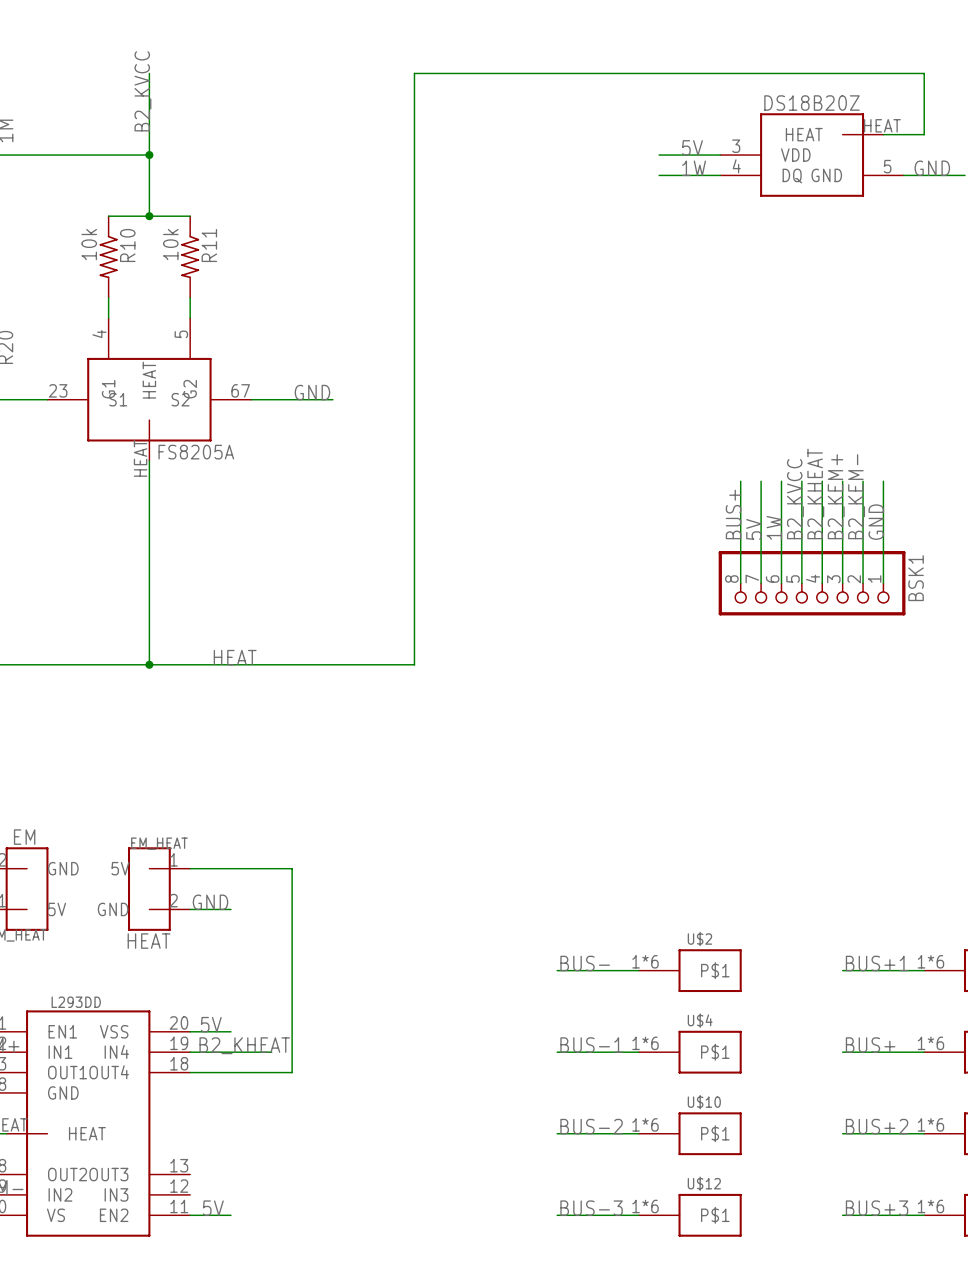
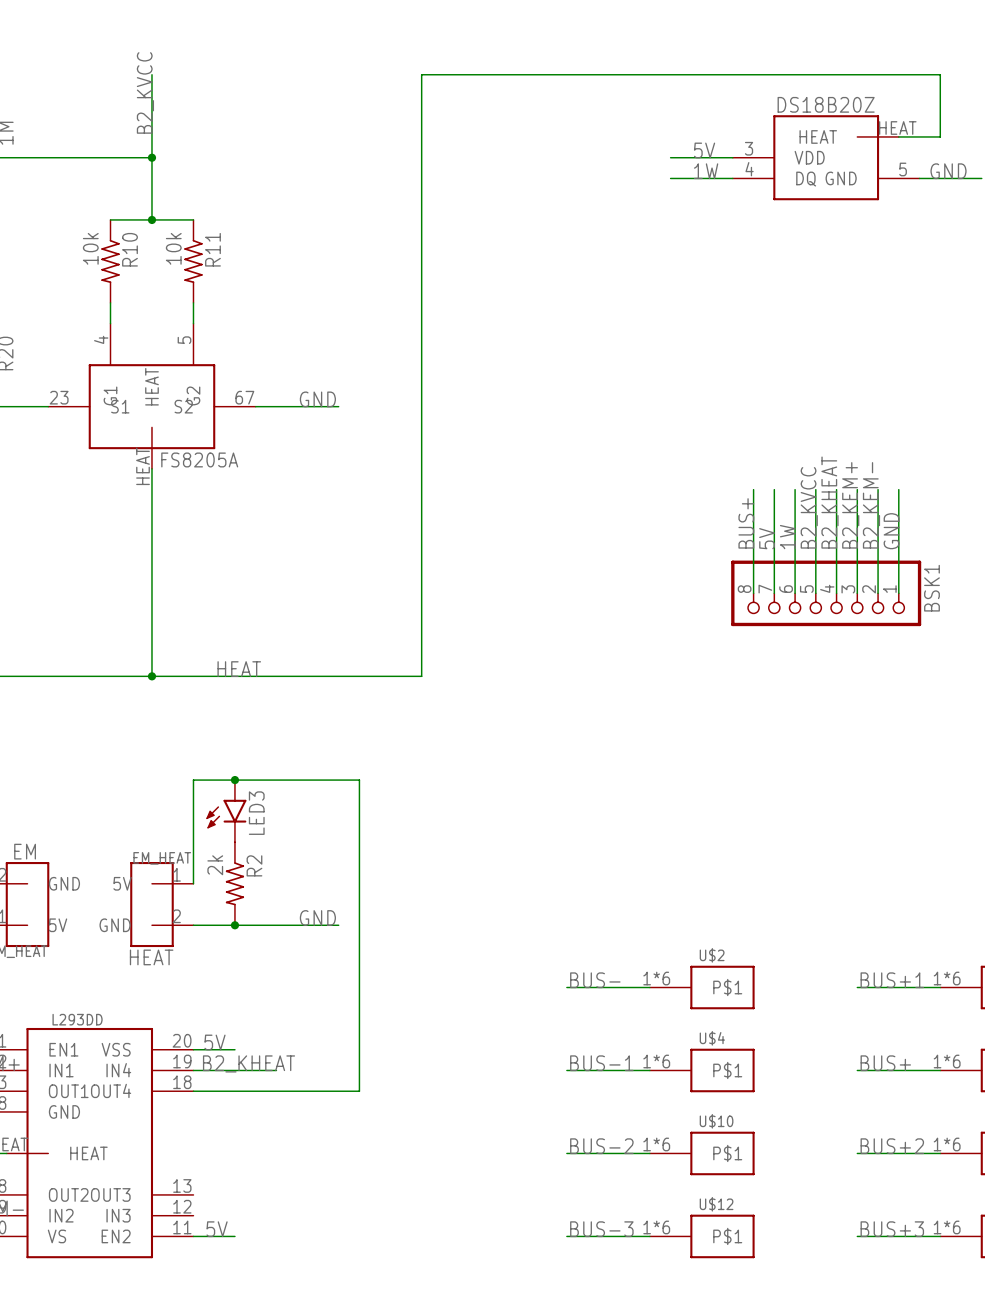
junction: none -> (234, 780)
LED3: none -> (226, 811)
wire: (190, 868) (292, 868) (292, 1072) -> (193, 883) (193, 780) (359, 780) (359, 1091) (297, 1091)
R2: none -> 2k (234, 883)
label position: GND (210, 902) -> GND (317, 918)
wire: none -> (234, 925) (338, 925)
junction: none -> (234, 925)

